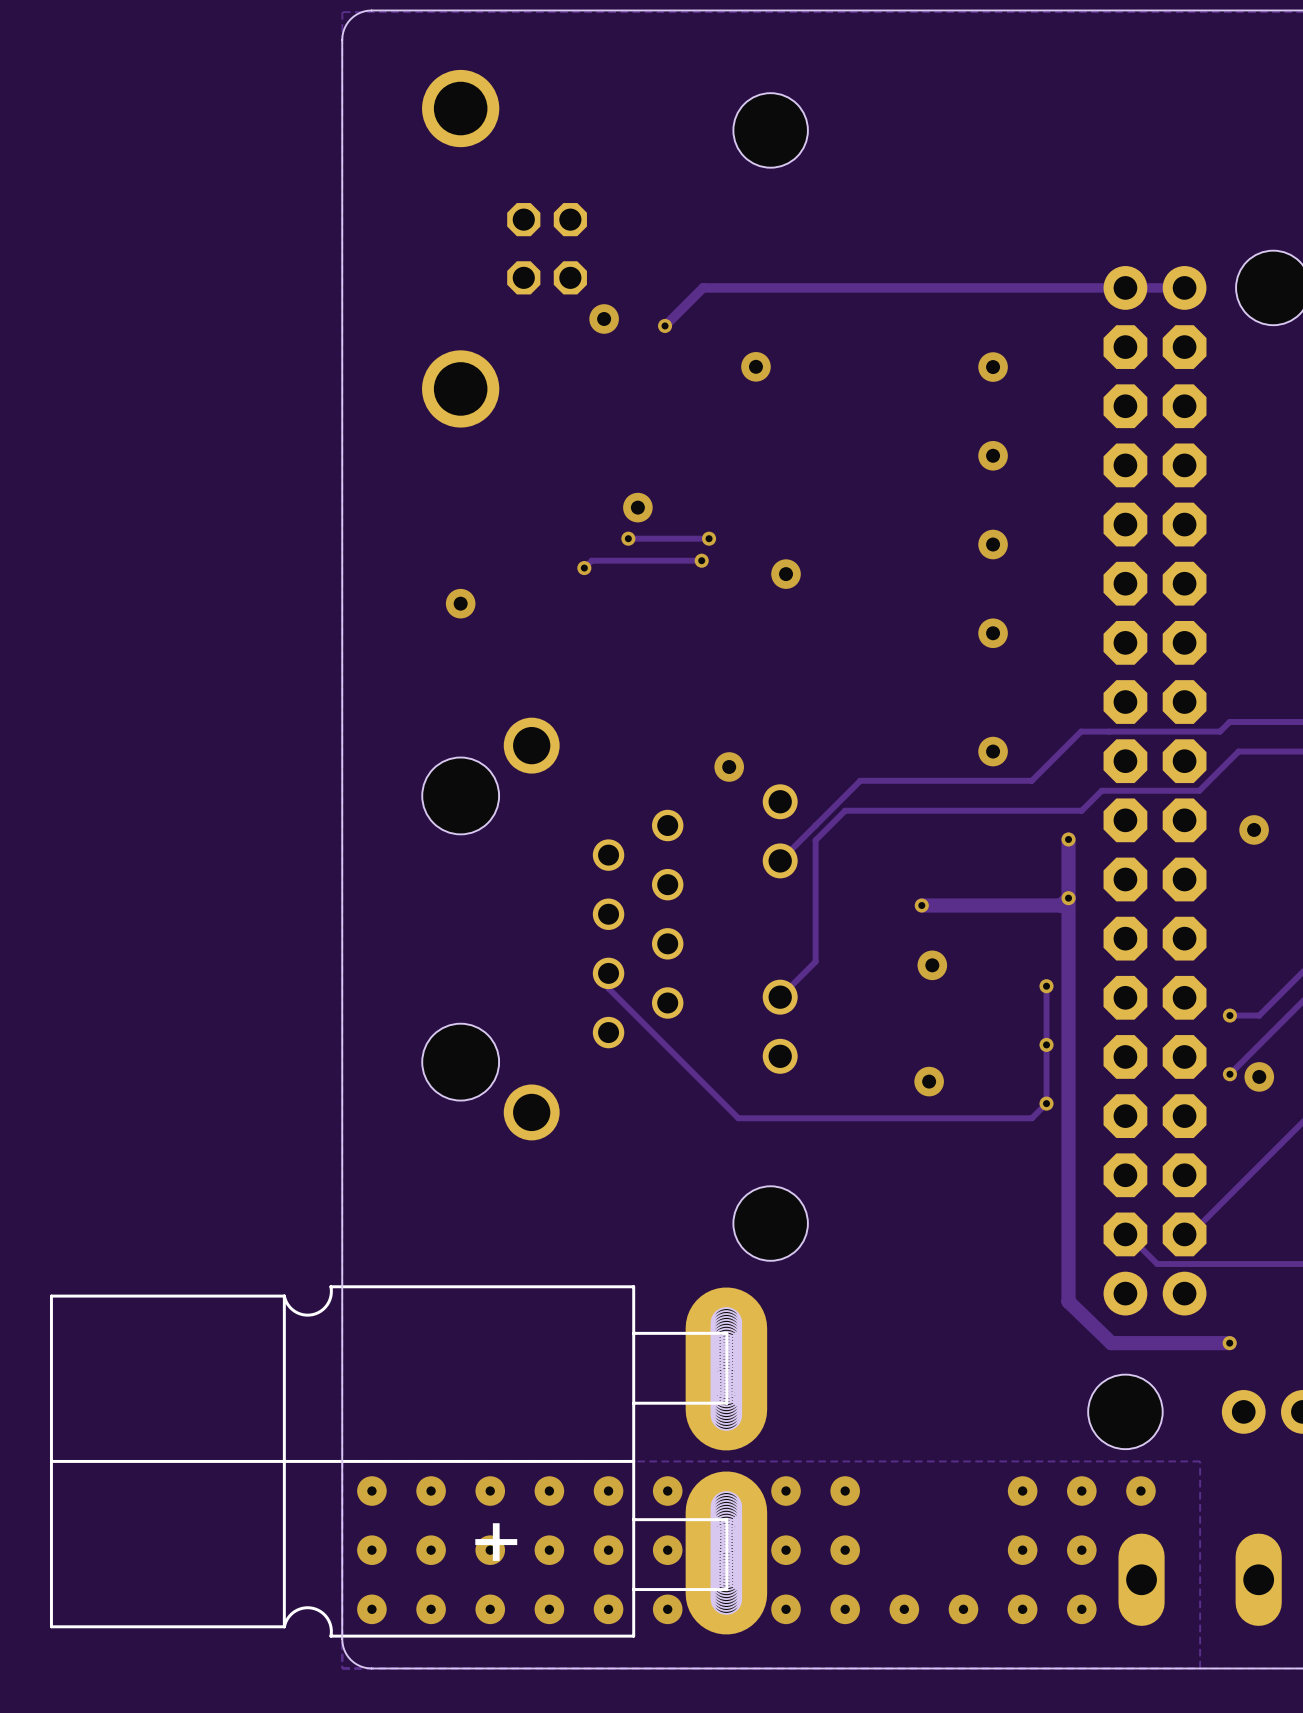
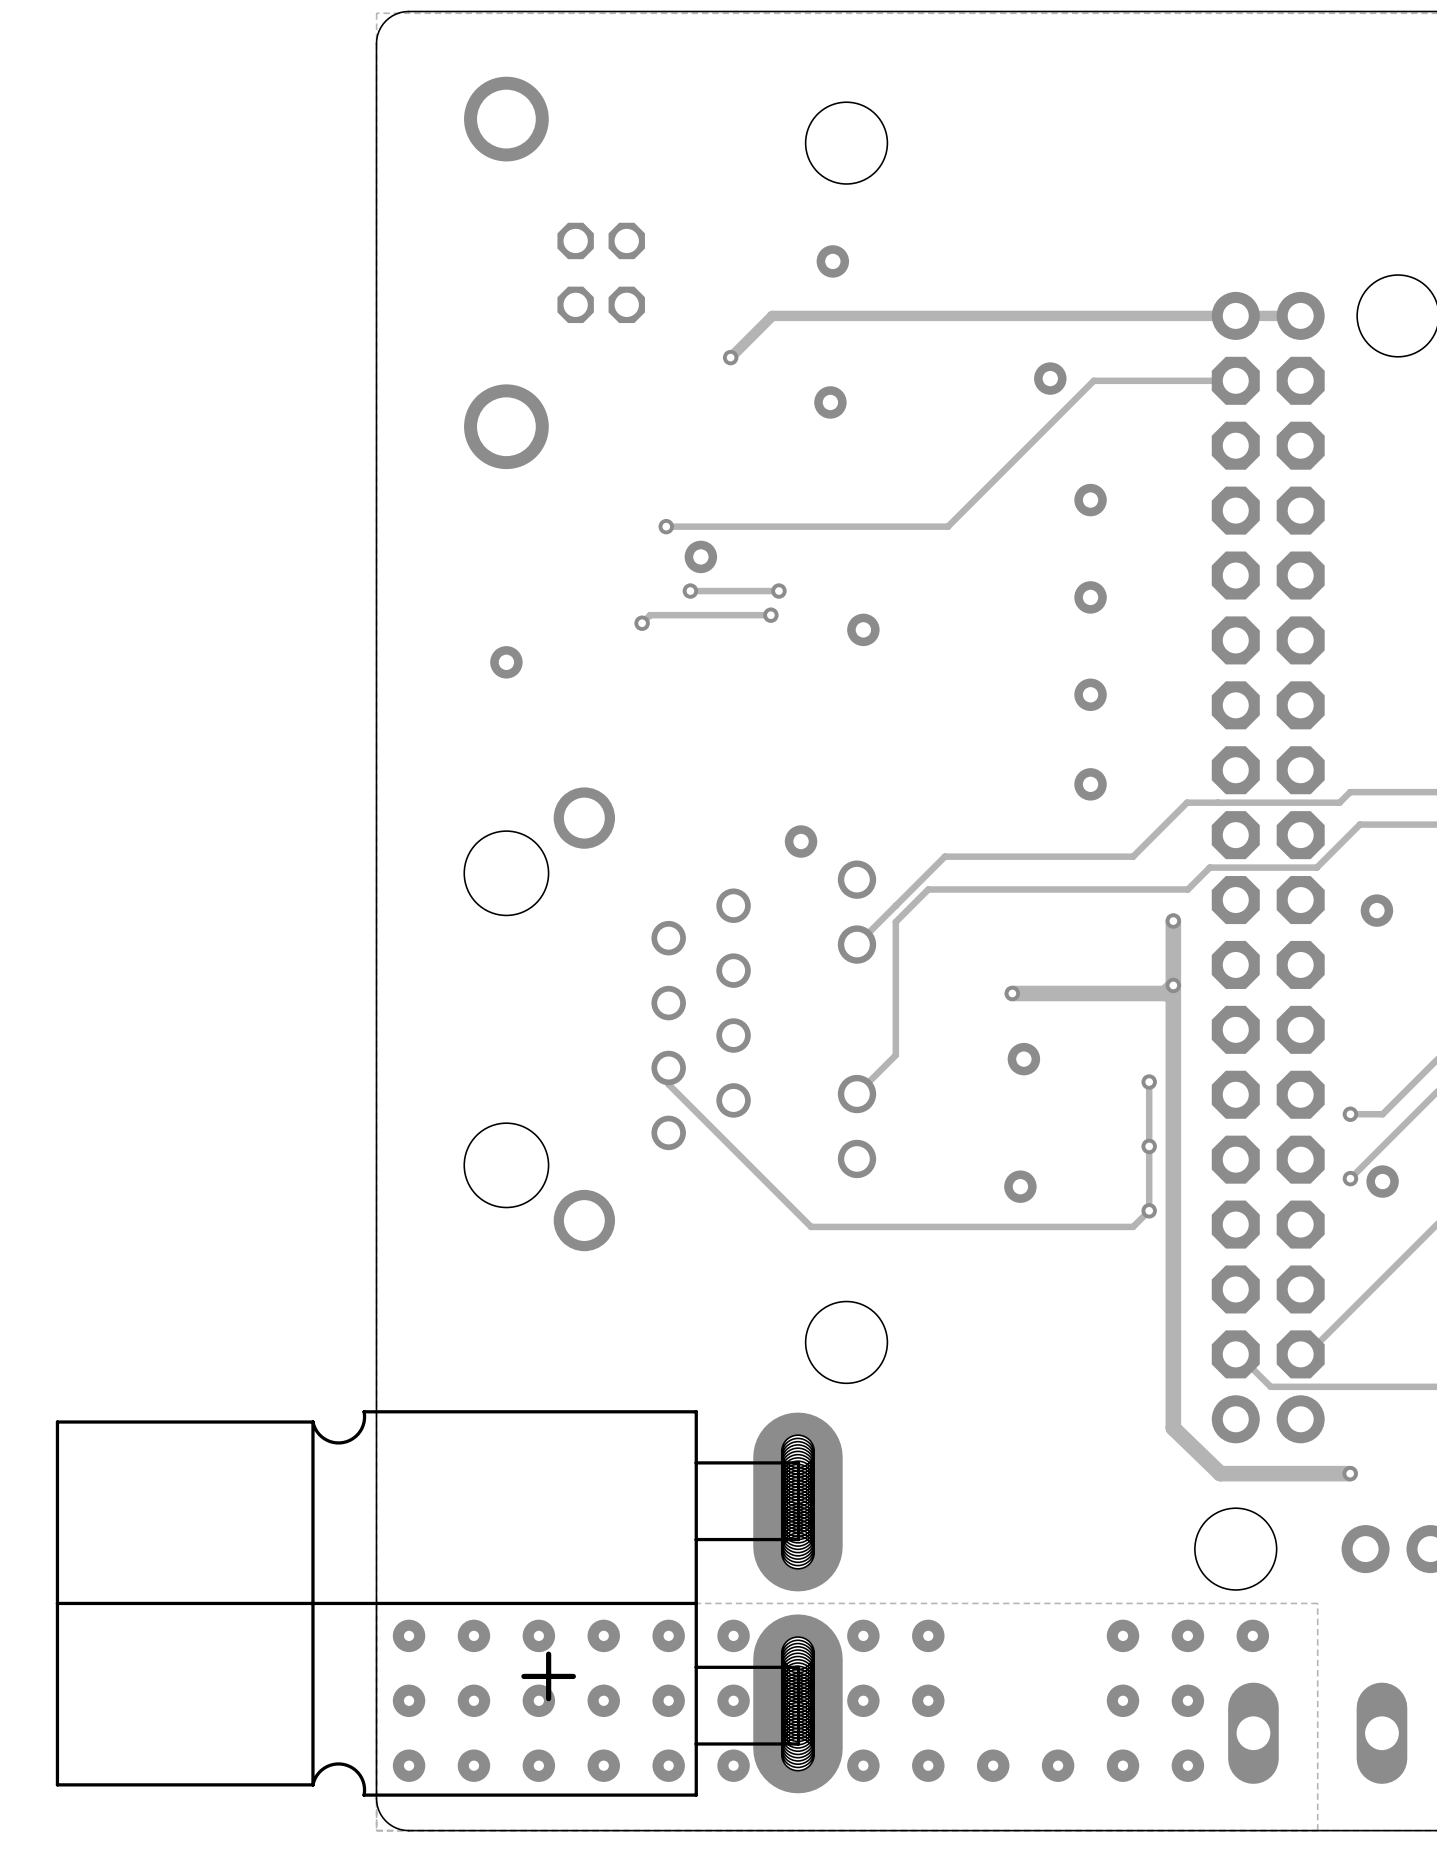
via: none -> (832, 261)
via: (604, 318) -> none
track: none -> (1235, 380) (1093, 380) (947, 526) (666, 526)
via position: (993, 367) -> (1050, 378)
via: none -> (666, 526)
via position: (993, 751) -> (1090, 784)

